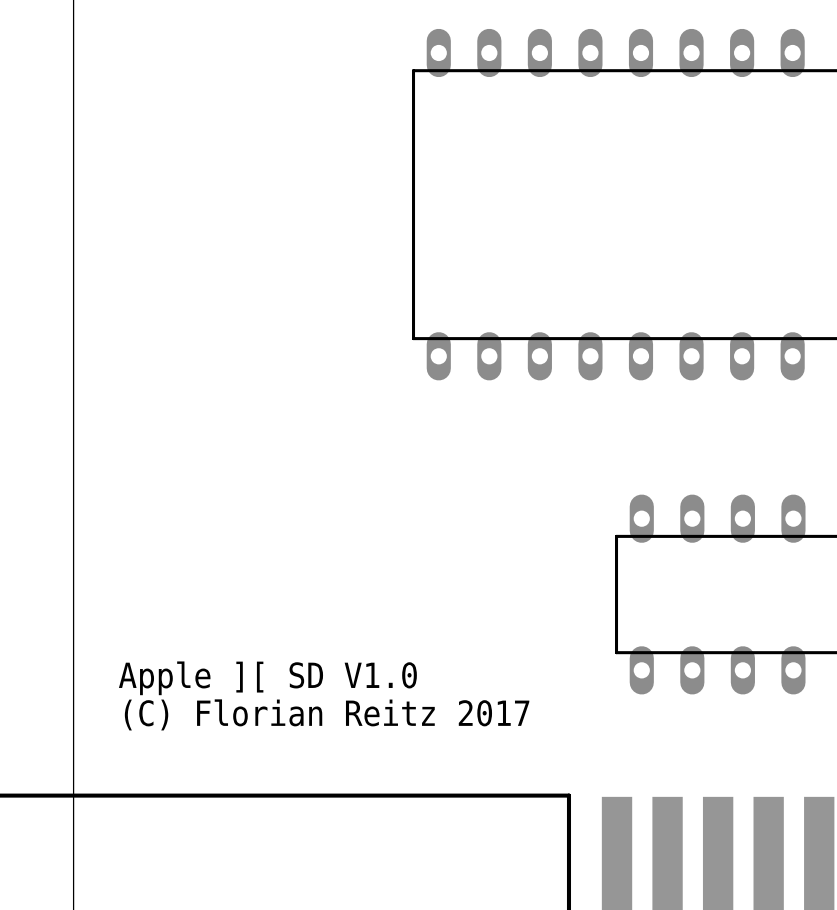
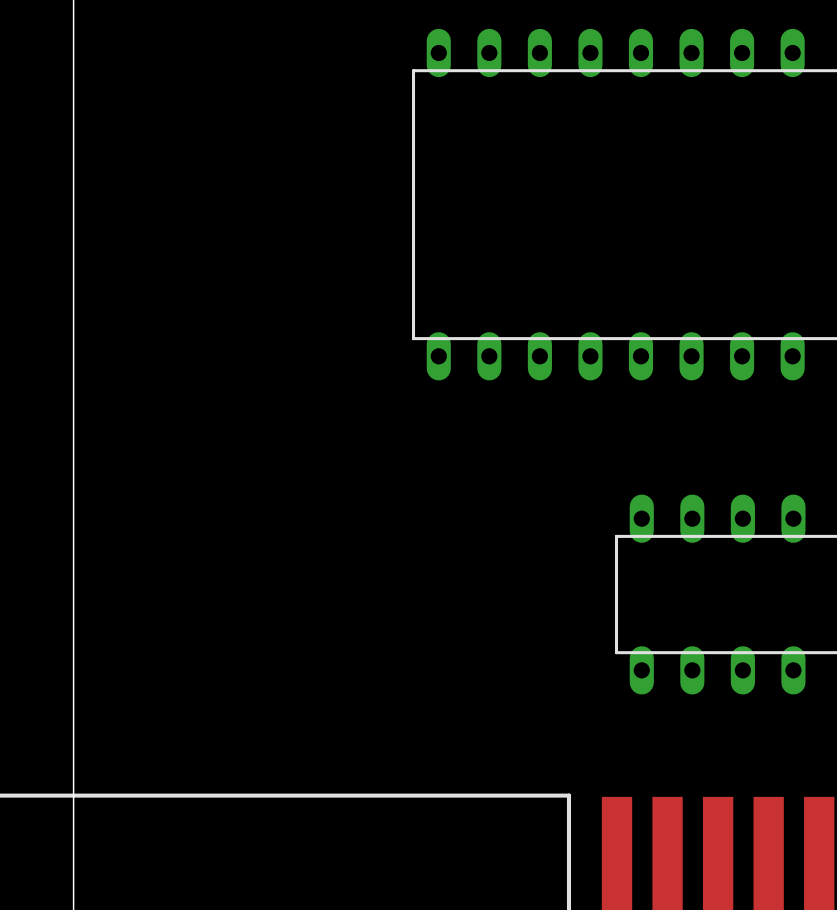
text: Apple ][ SD V1.0 (267, 678) -> none
text: (C) Florian Reitz 2017 (327, 714) -> none

